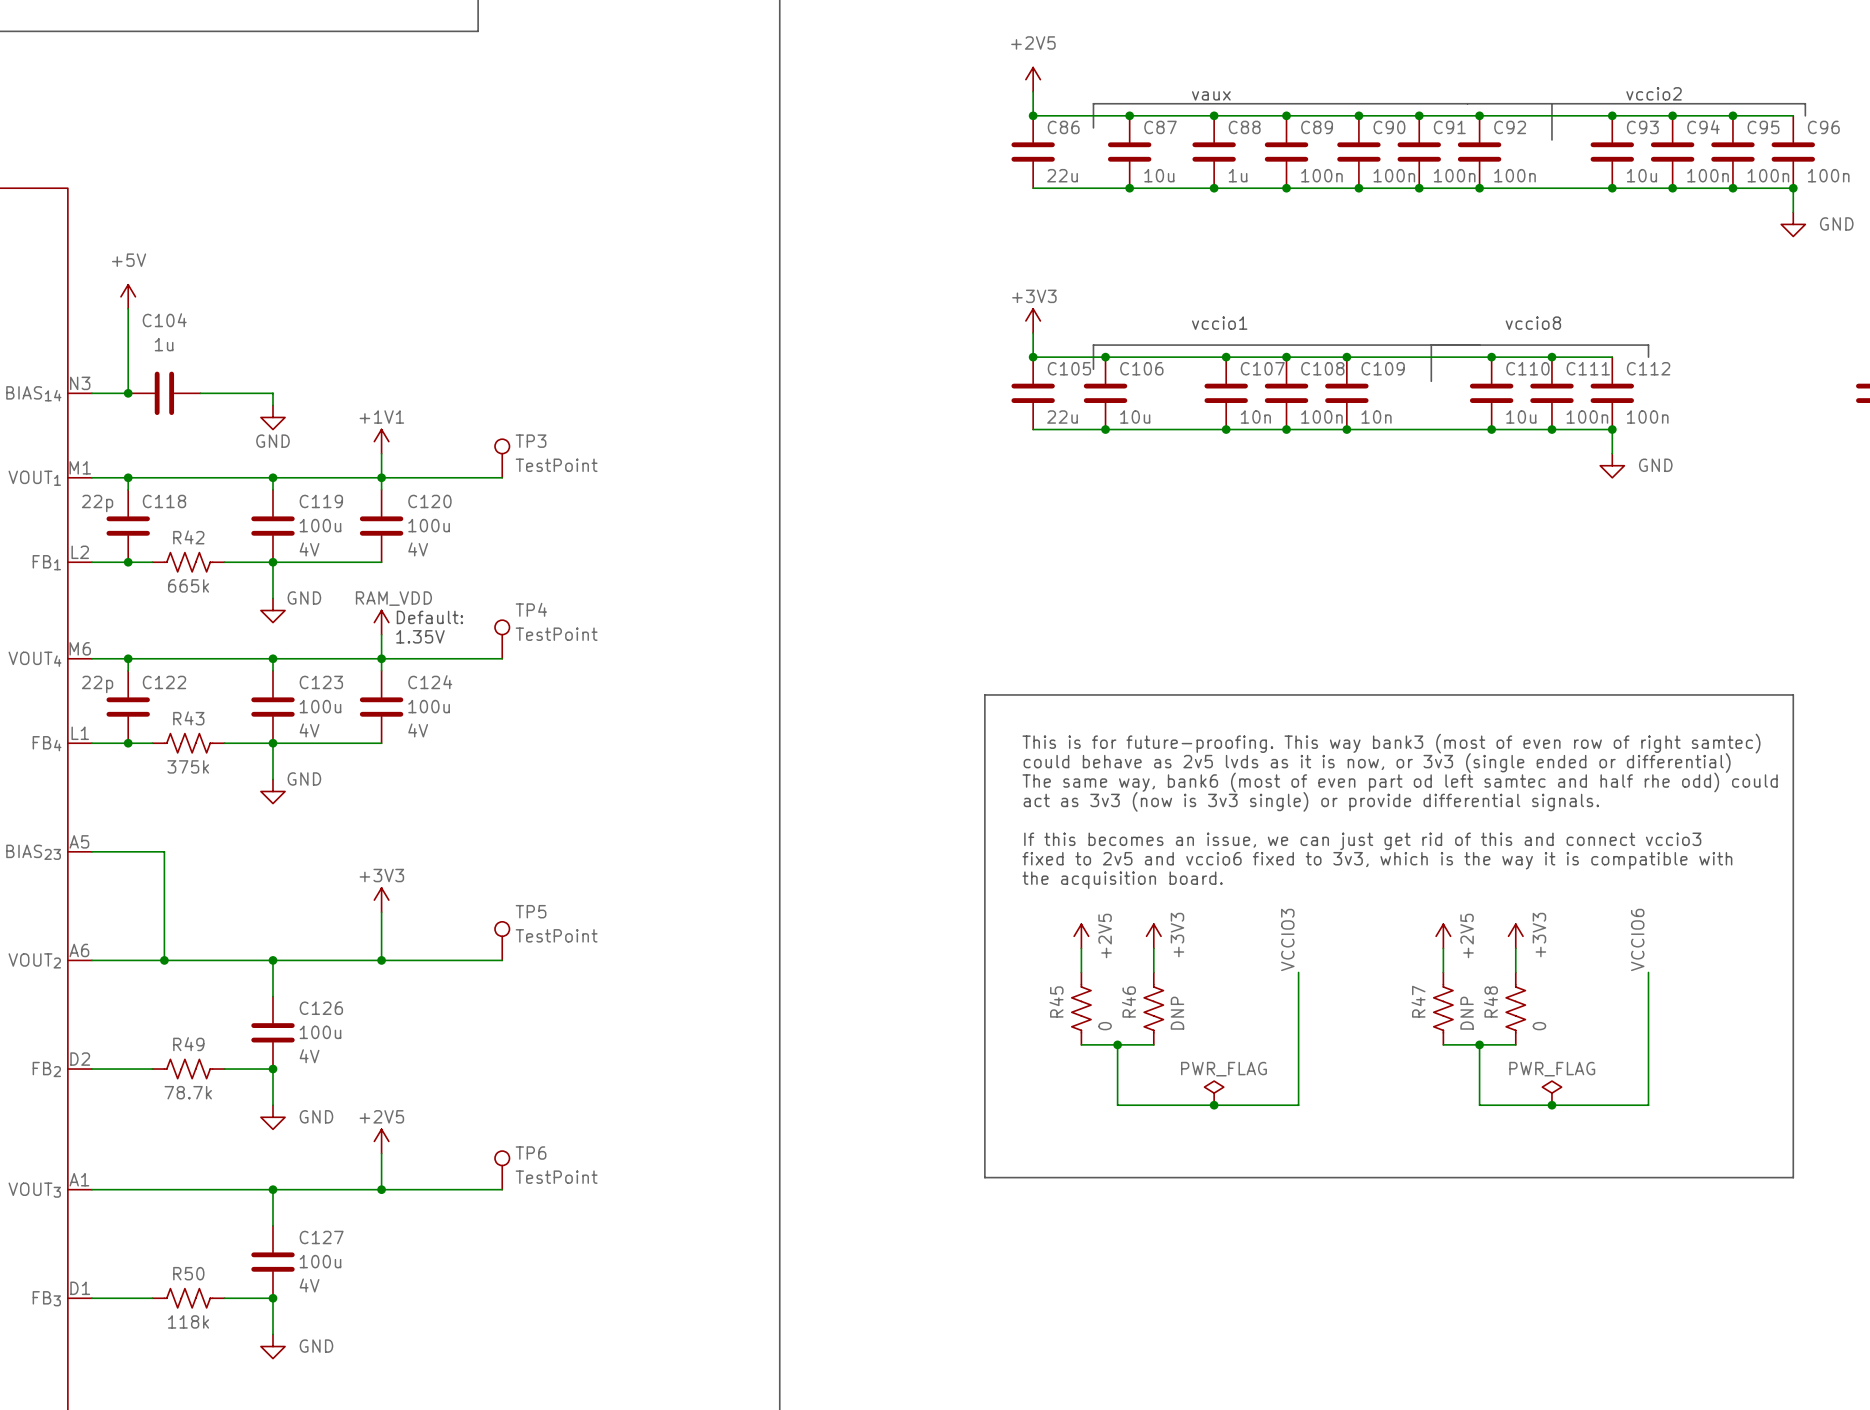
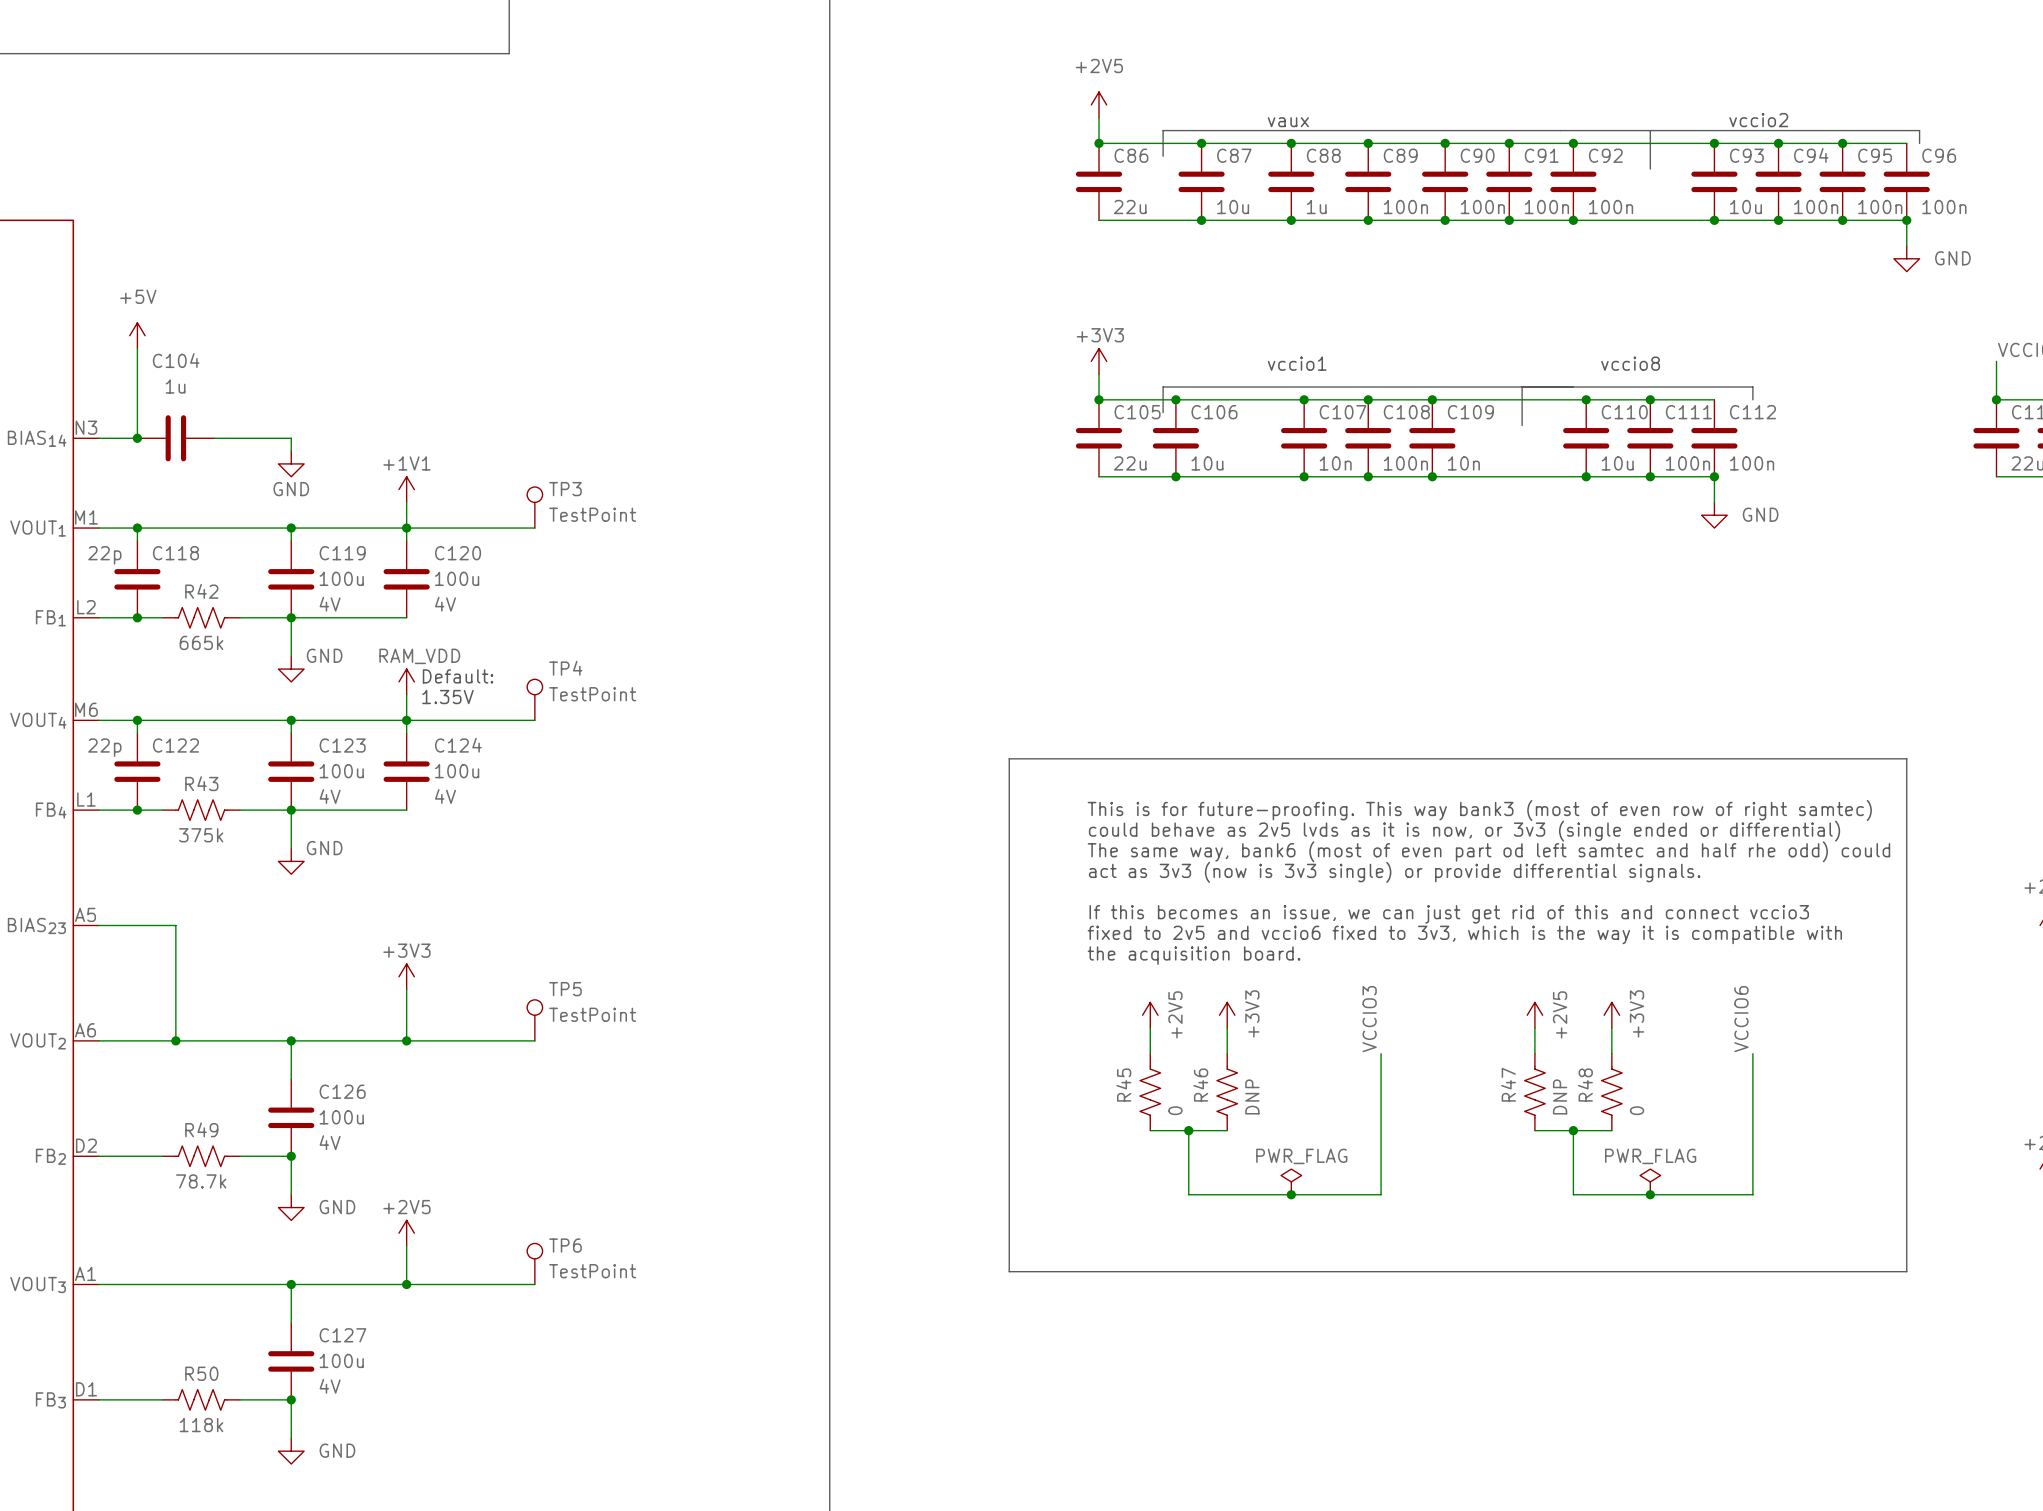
line: (984, 694) (984, 1177) -> (1047, 758) (1009, 758) (1009, 1271) (1047, 1271)

